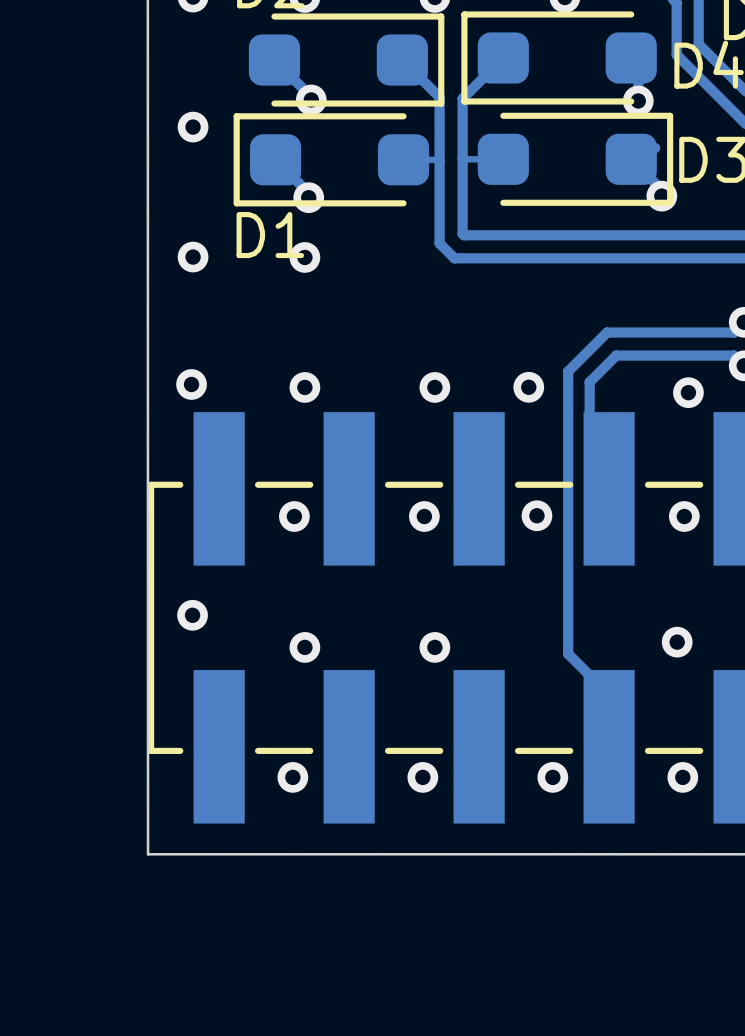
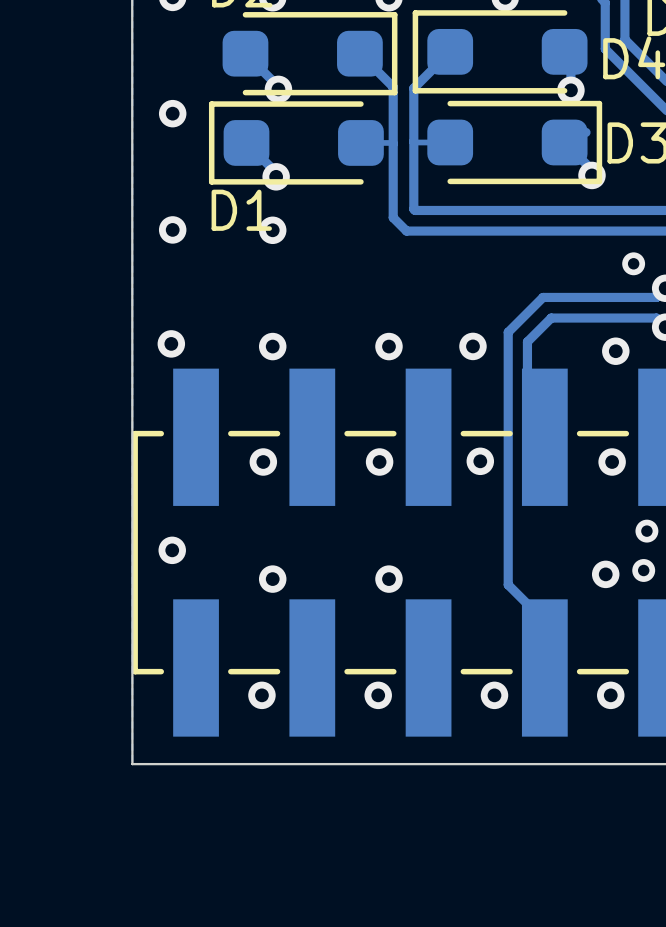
via: none -> (633, 263)
via: none -> (646, 531)
via: none -> (643, 570)

